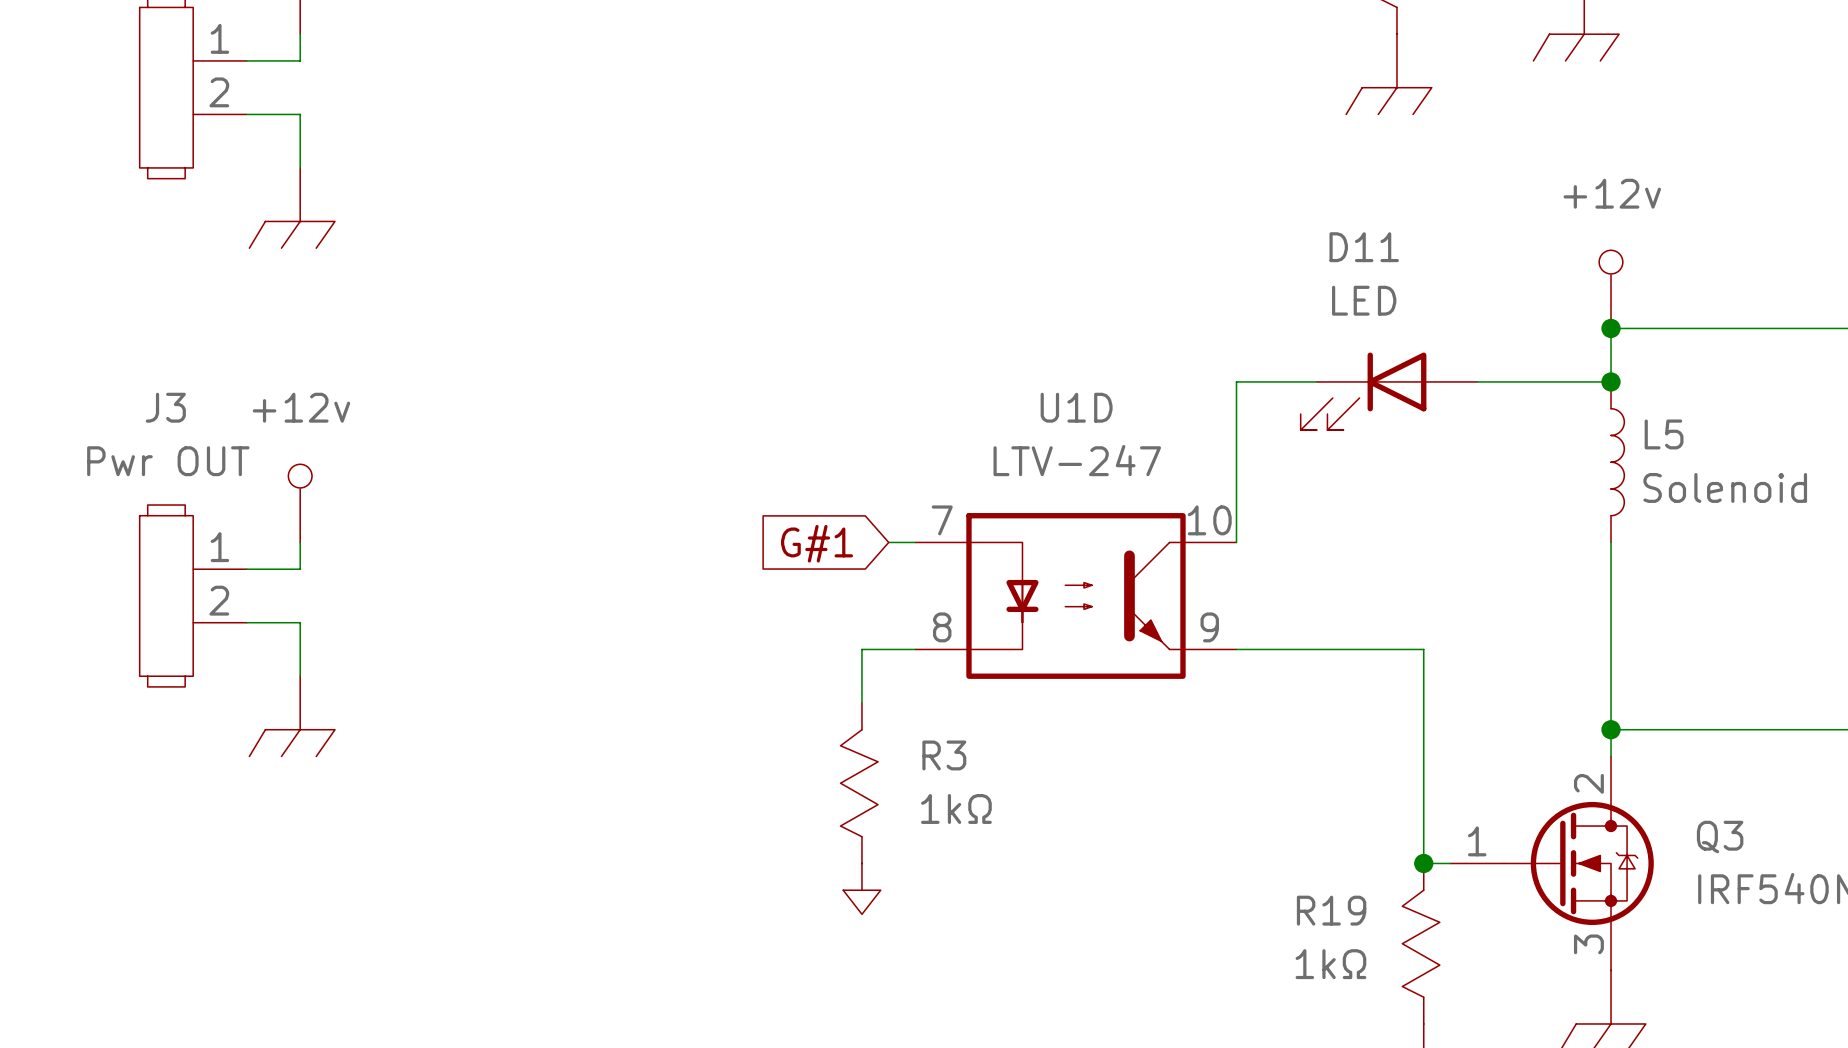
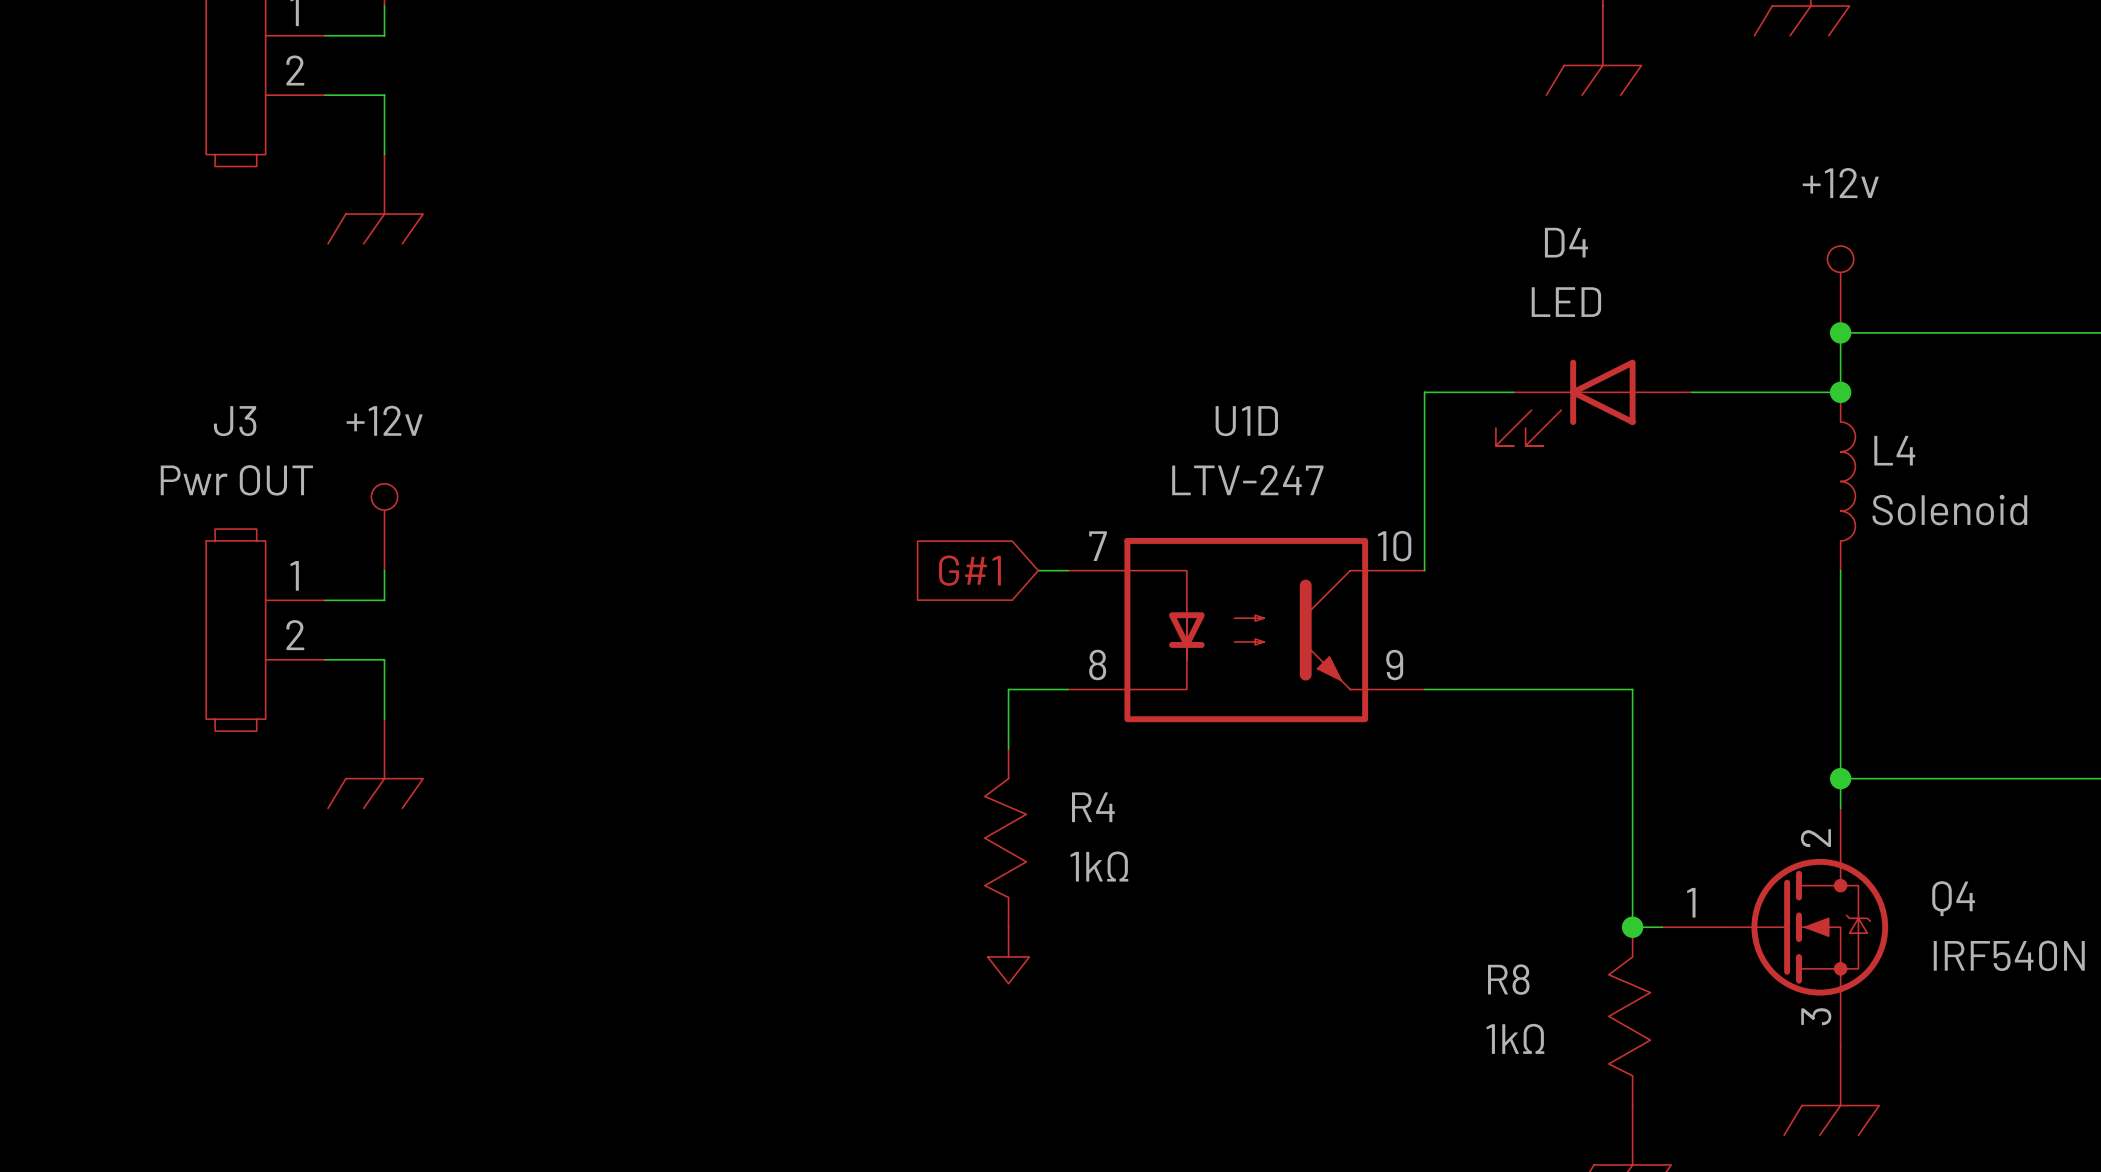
D11 name: D11 (1364, 247) -> D4 (1566, 242)
L5 name: L5 (1664, 434) -> L4 (1894, 450)
R3 name: R3 (944, 755) -> R4 (1093, 807)
Q3 name: Q3 (1720, 837) -> Q4 (1953, 898)
R19 name: R19 (1331, 910) -> R8 (1508, 979)

